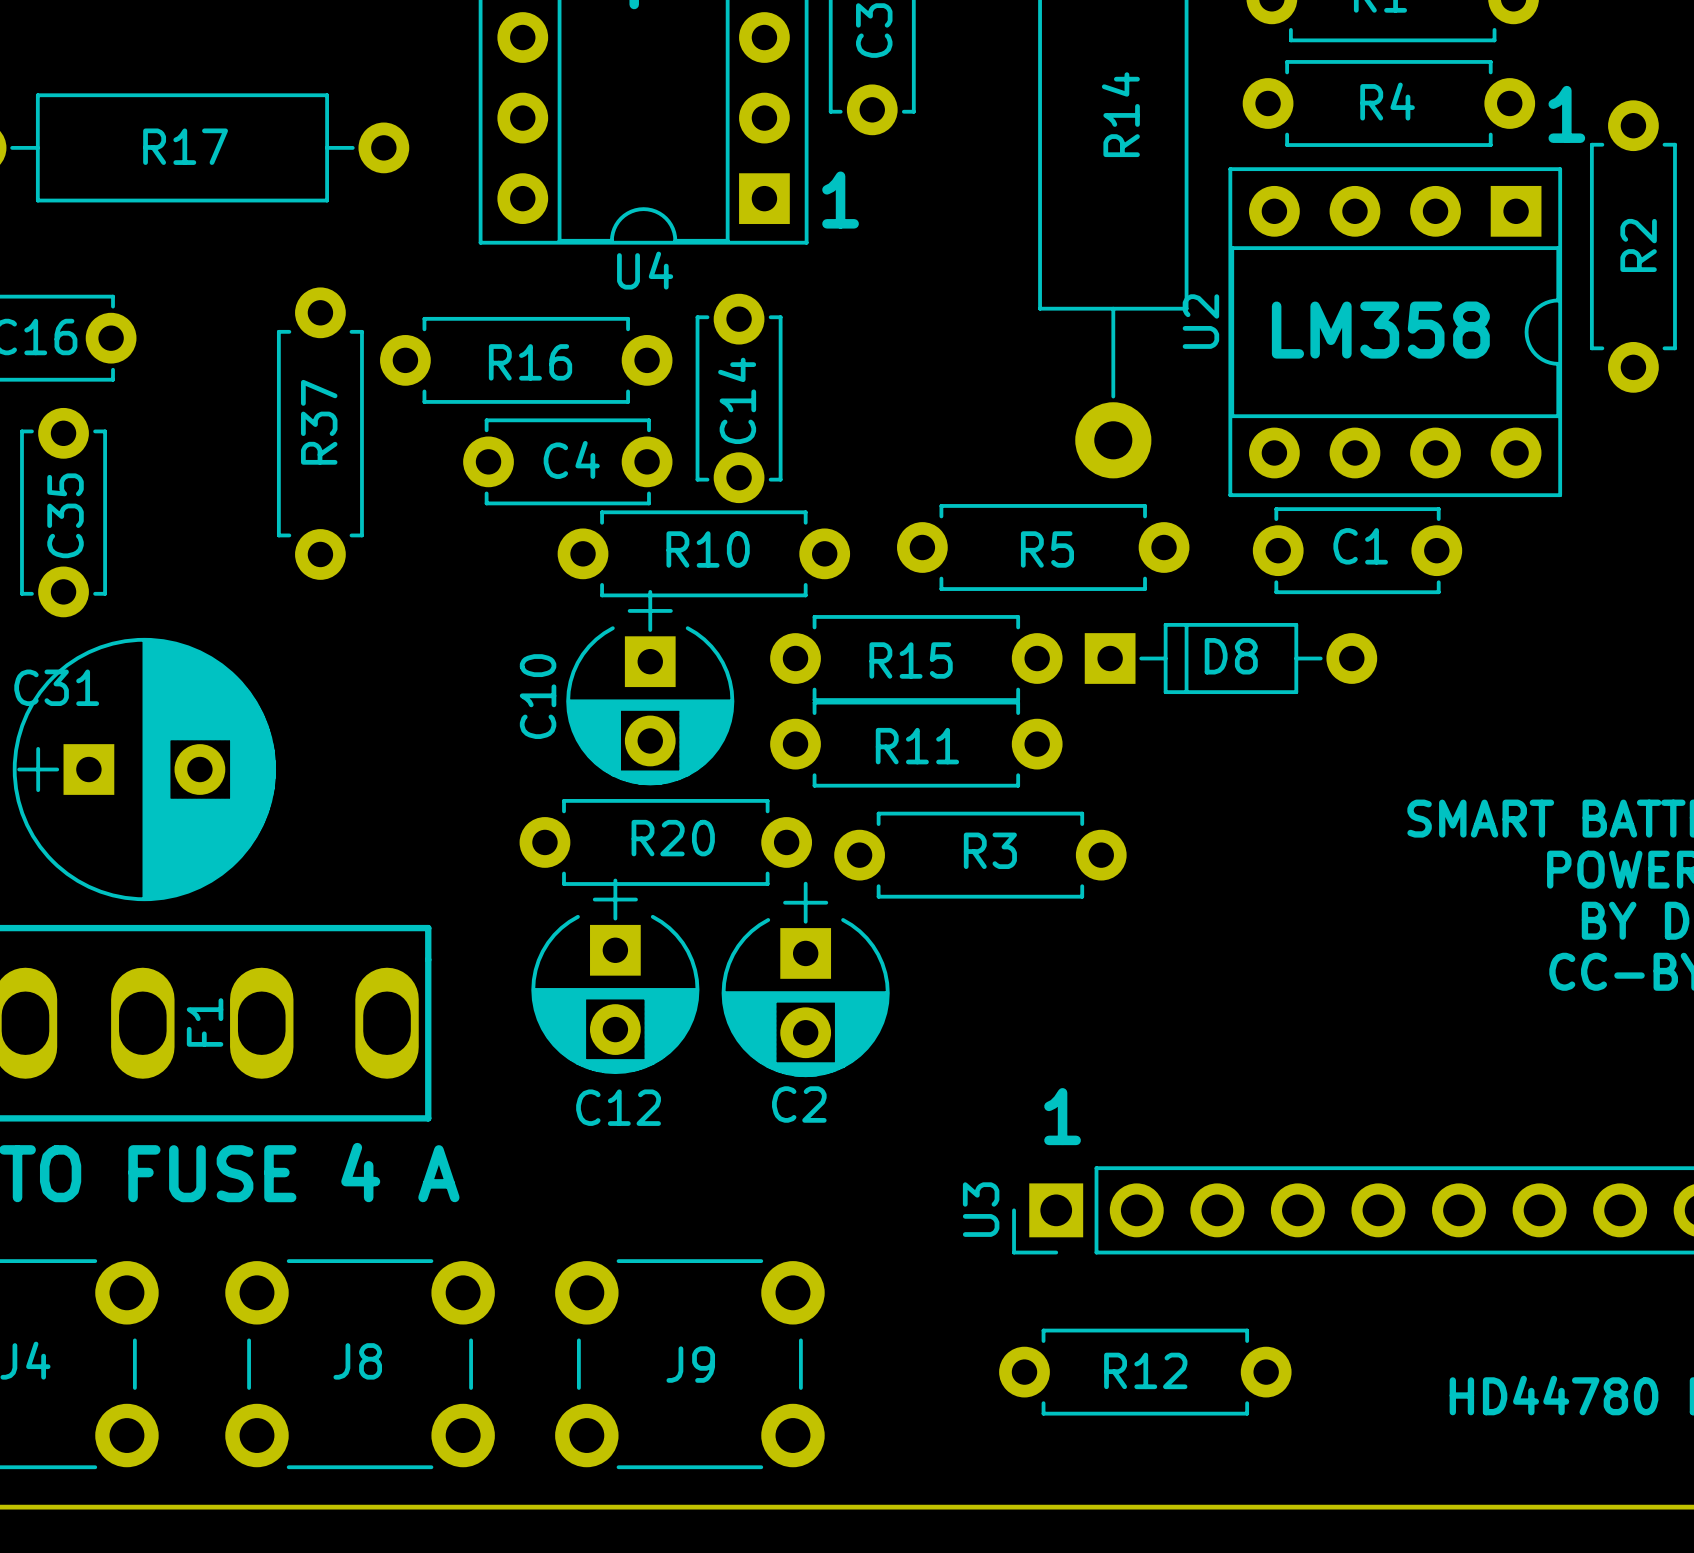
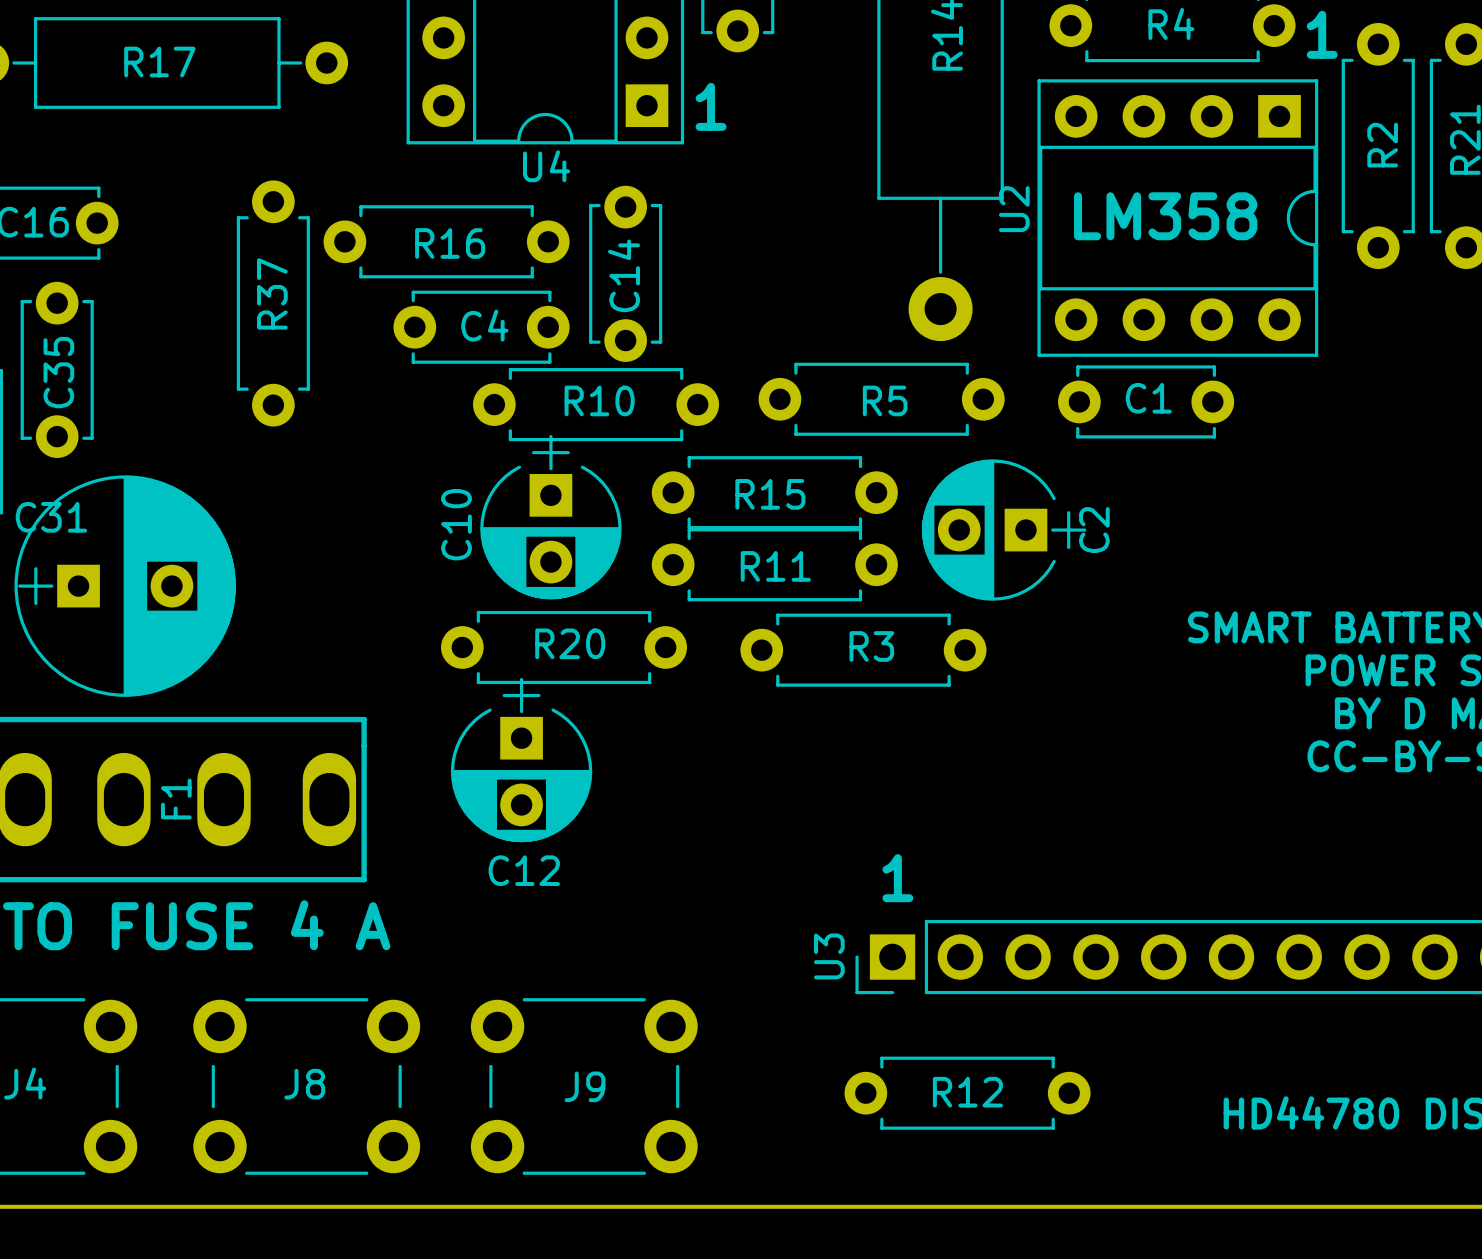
D8: (1230, 658) -> none
R3 position: (980, 855) -> (863, 650)
C2 rotation: 0° (805, 979) -> 90° clockwise (1004, 530)
C2 position: (805, 979) -> (1004, 530)
C2 name position: C2 (799, 1104) -> C2 (1094, 530)

